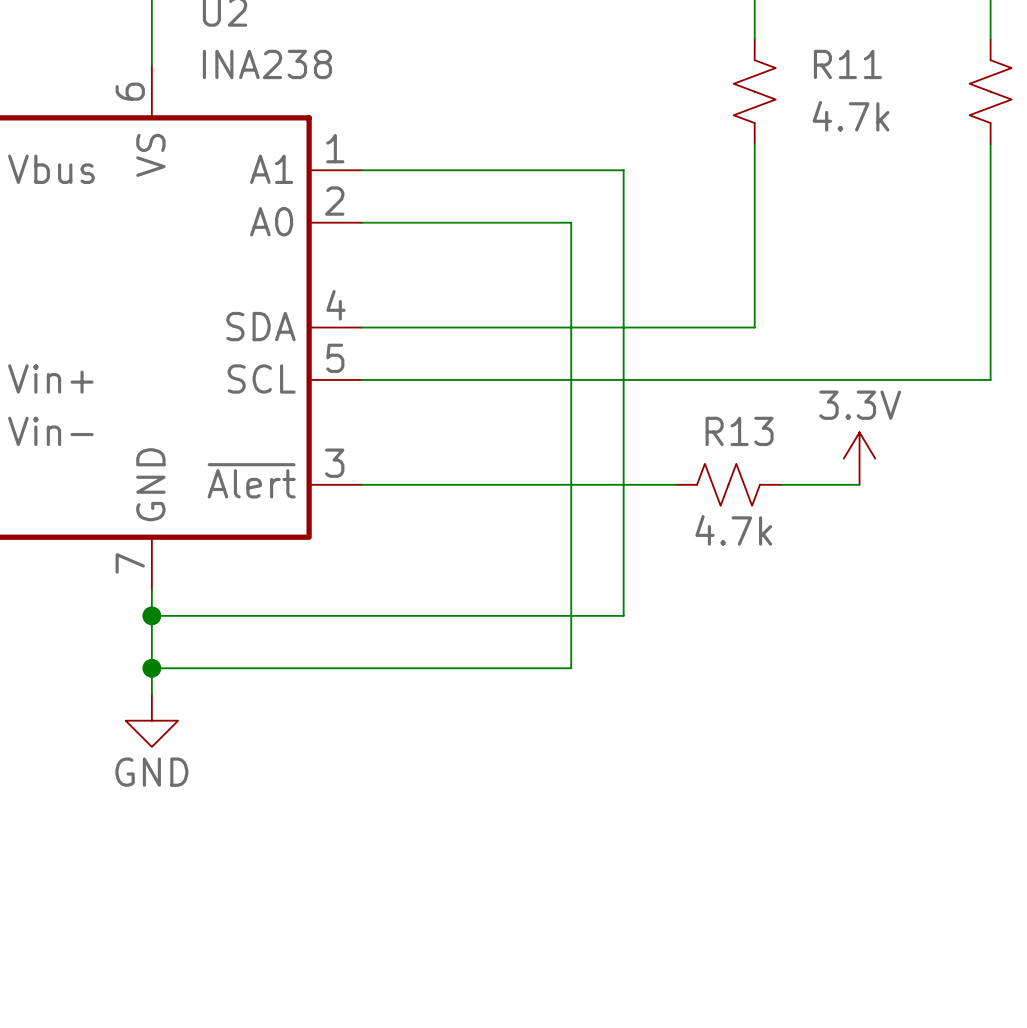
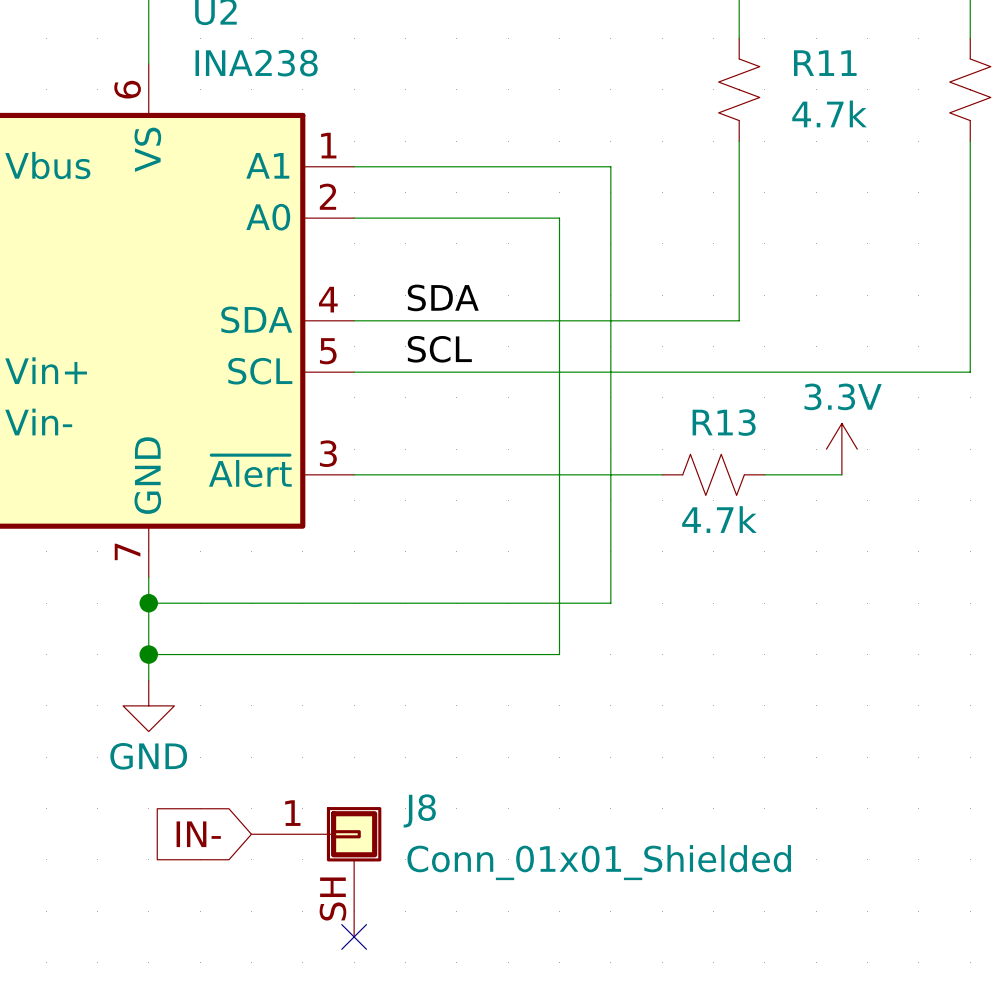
label: none -> SDA (443, 297)
label: none -> SCL (439, 349)
global label: none -> IN- (198, 834)
J8: none -> Conn_01x01_Shielded (316, 871)
no-connect mark: none -> (354, 936)

